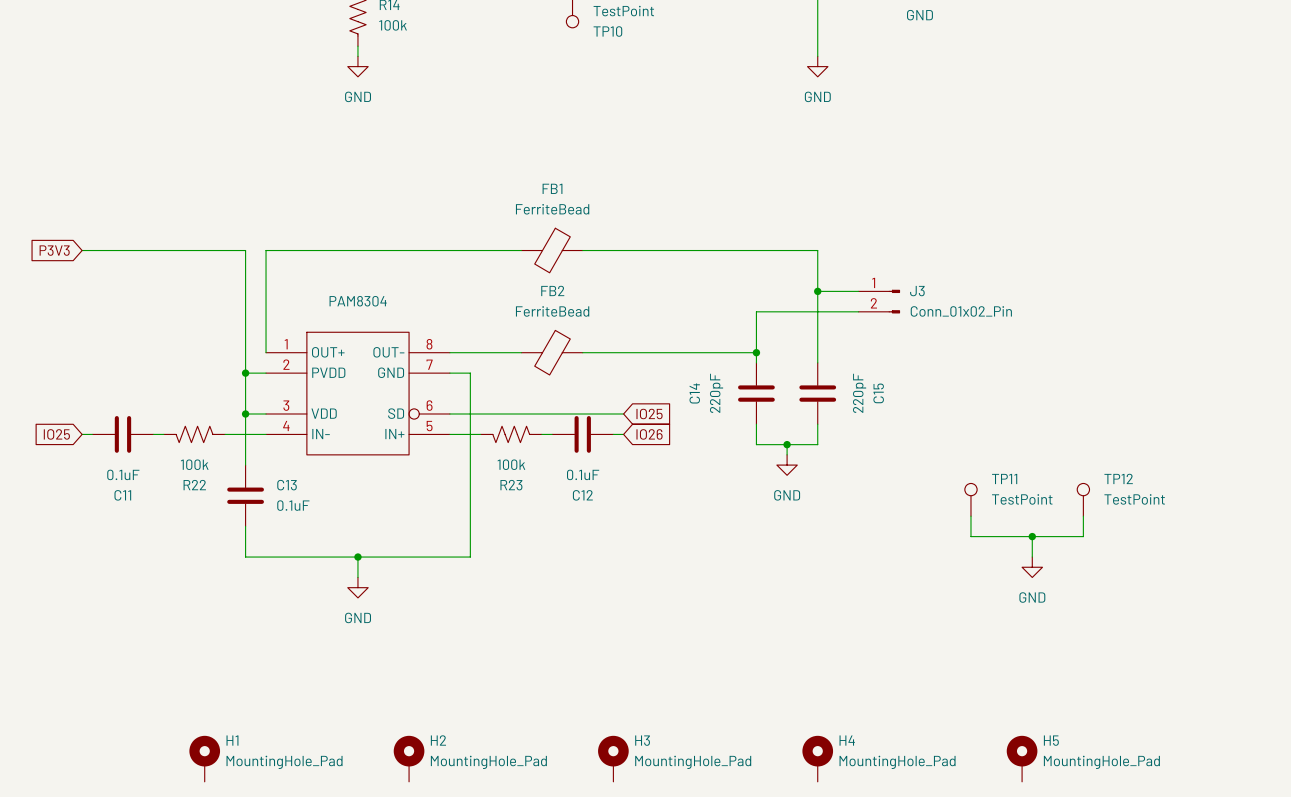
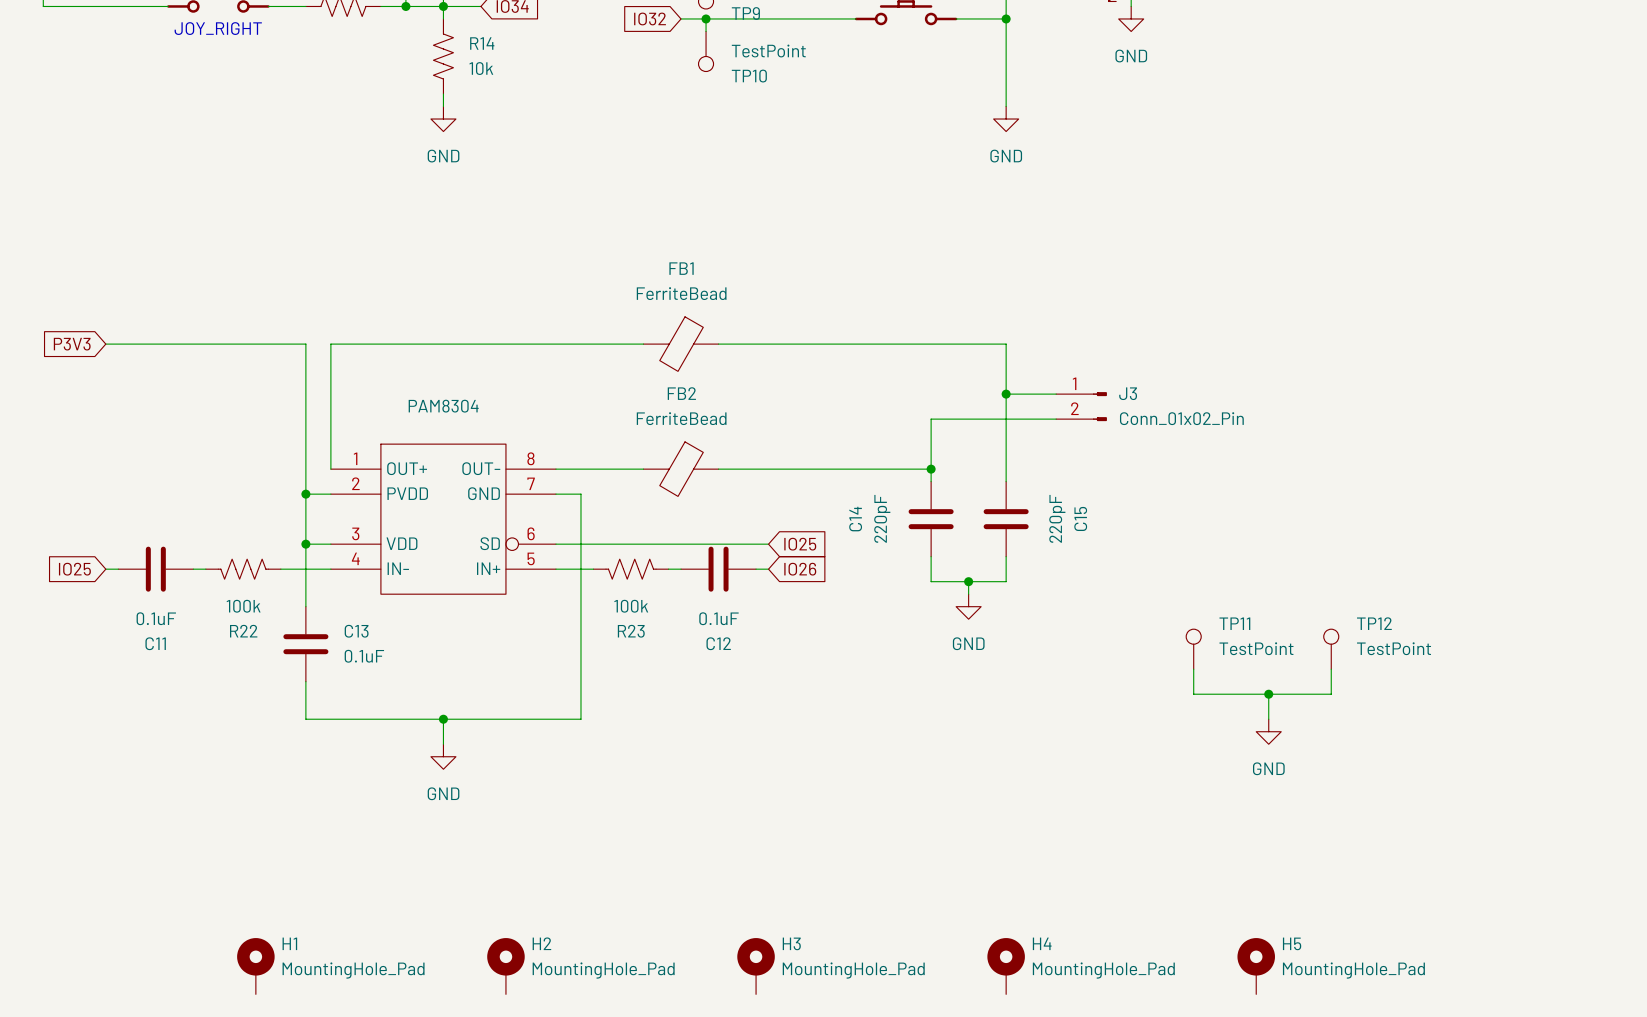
R14 value: 100k (393, 25) -> 10k (481, 68)

